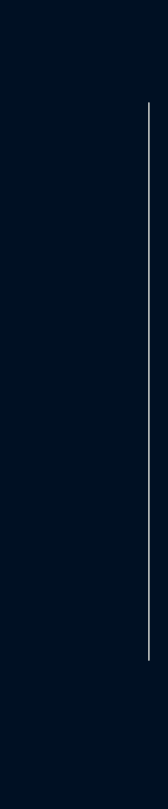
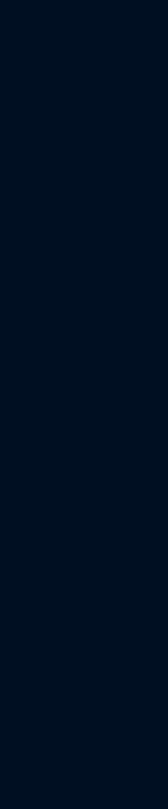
board edge: (148, 102) (148, 660) -> none

